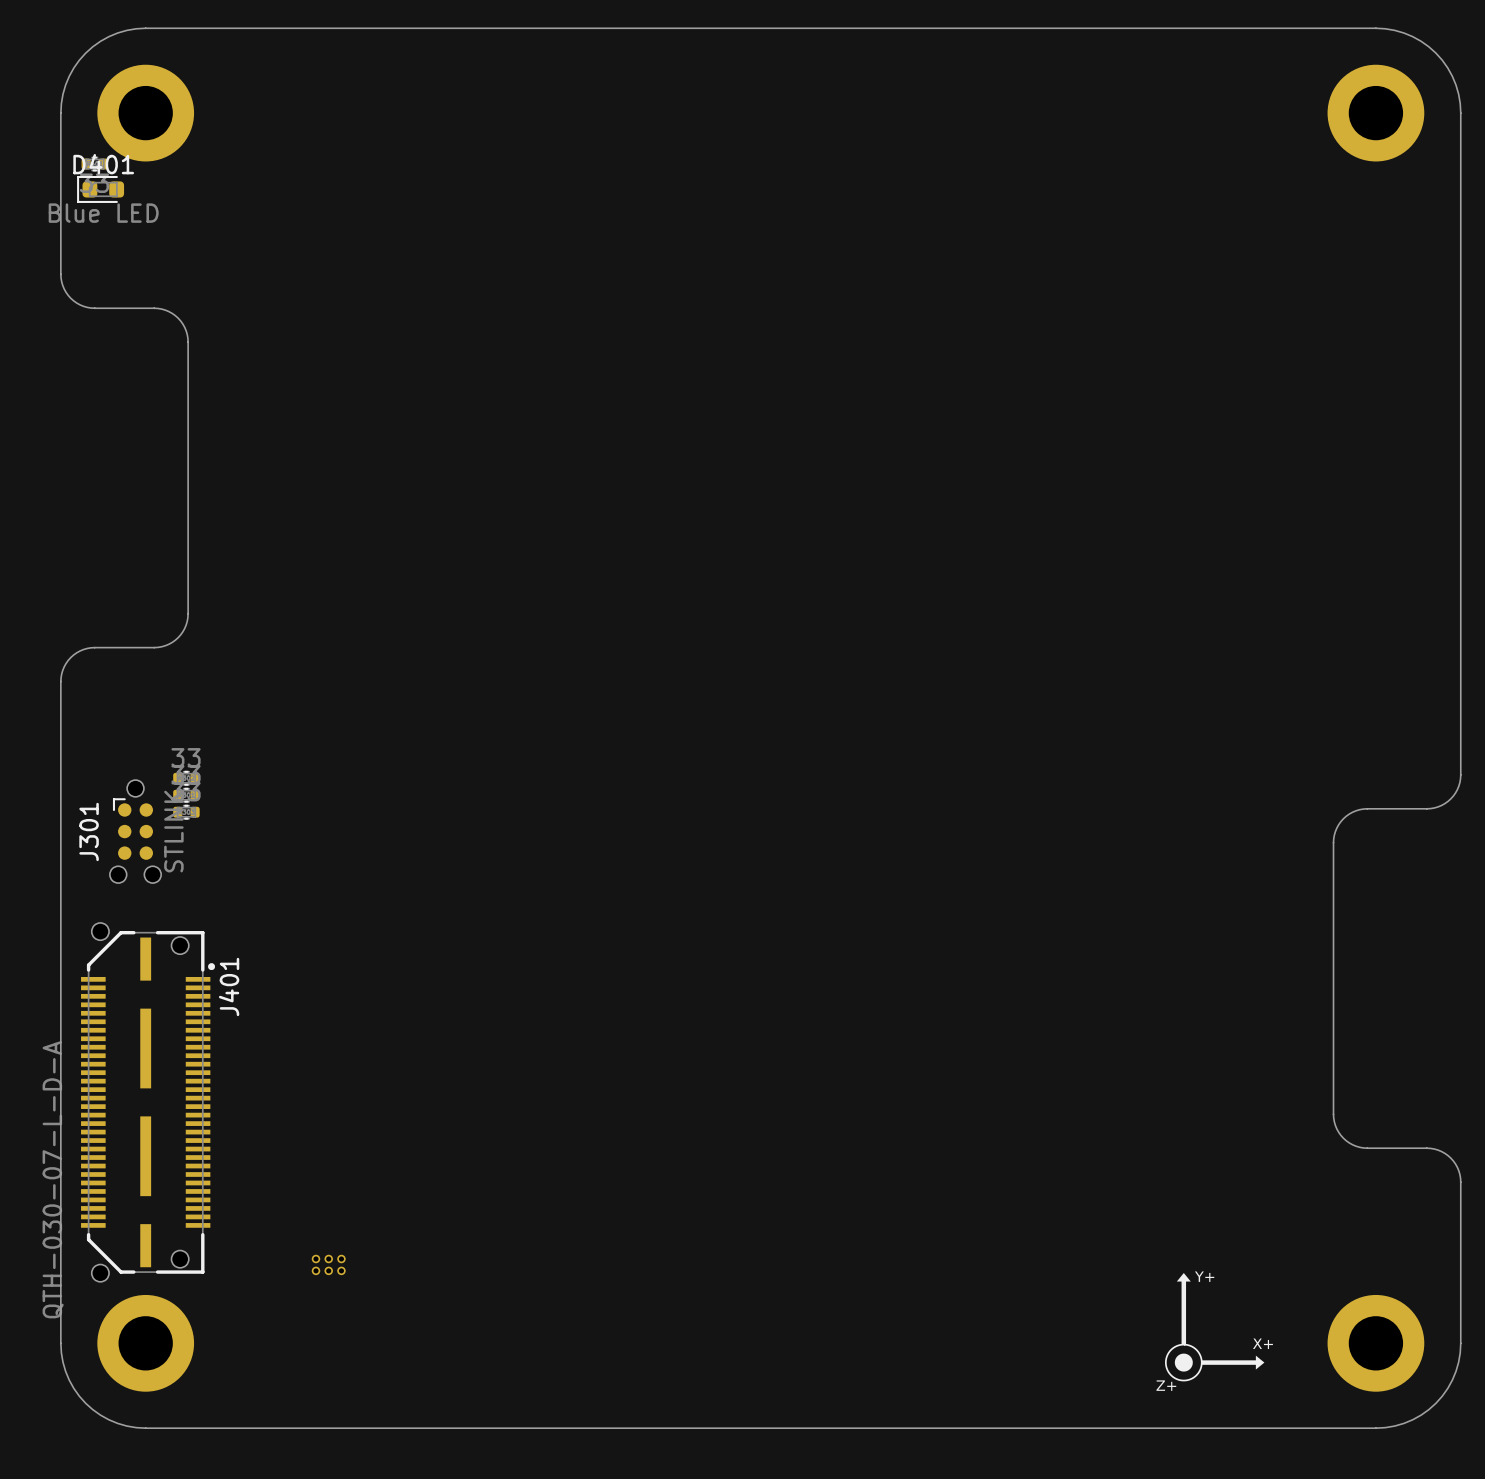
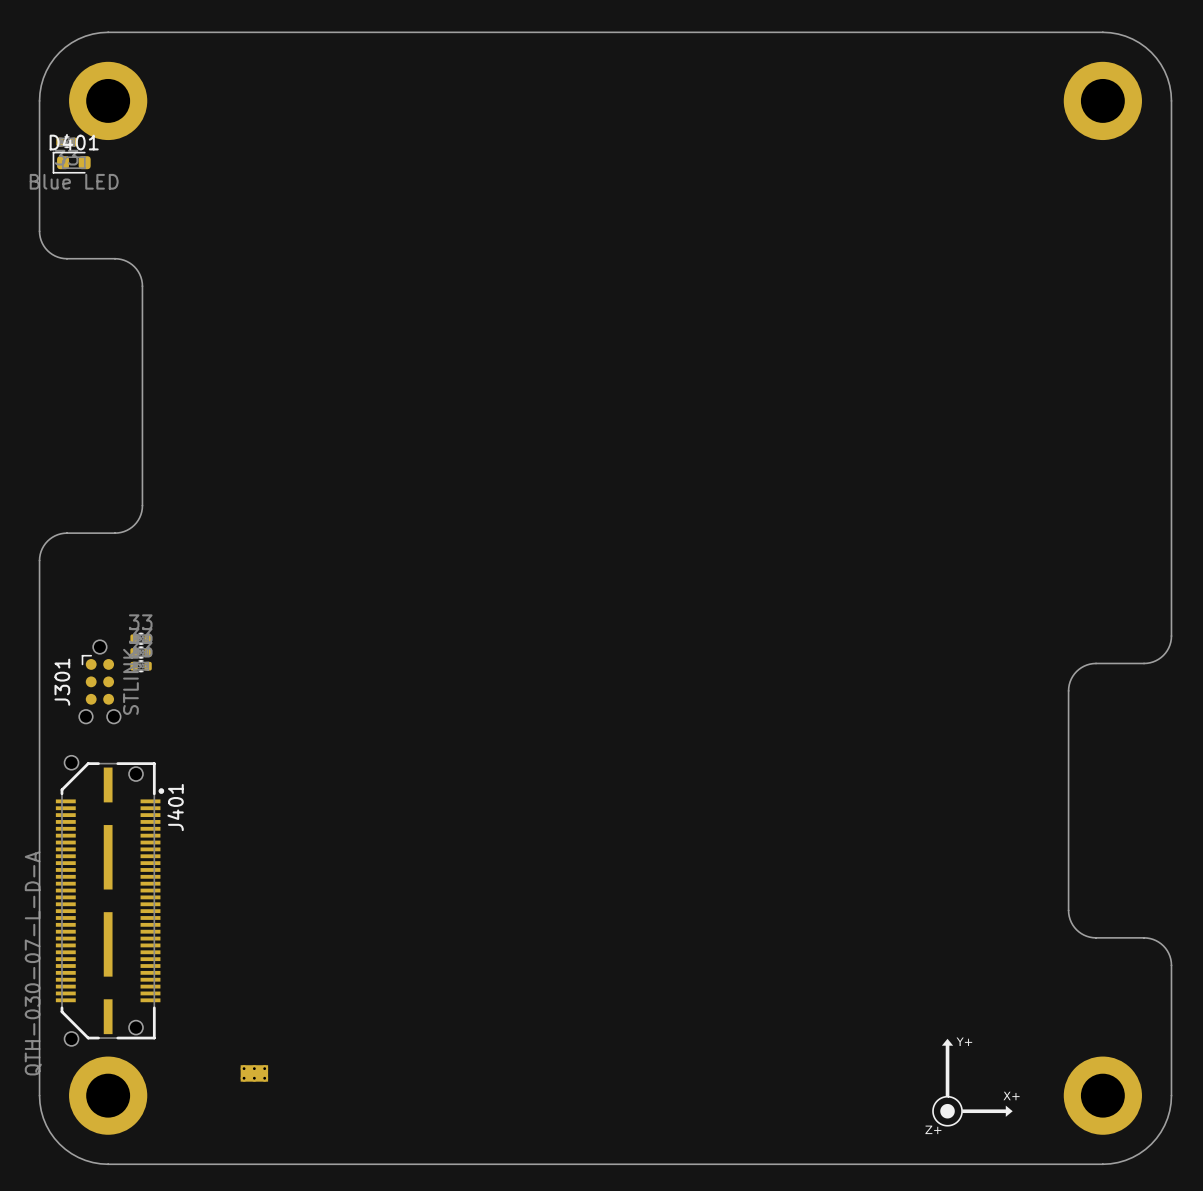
part: (328, 1264) -> none
part: none -> (254, 1073)

